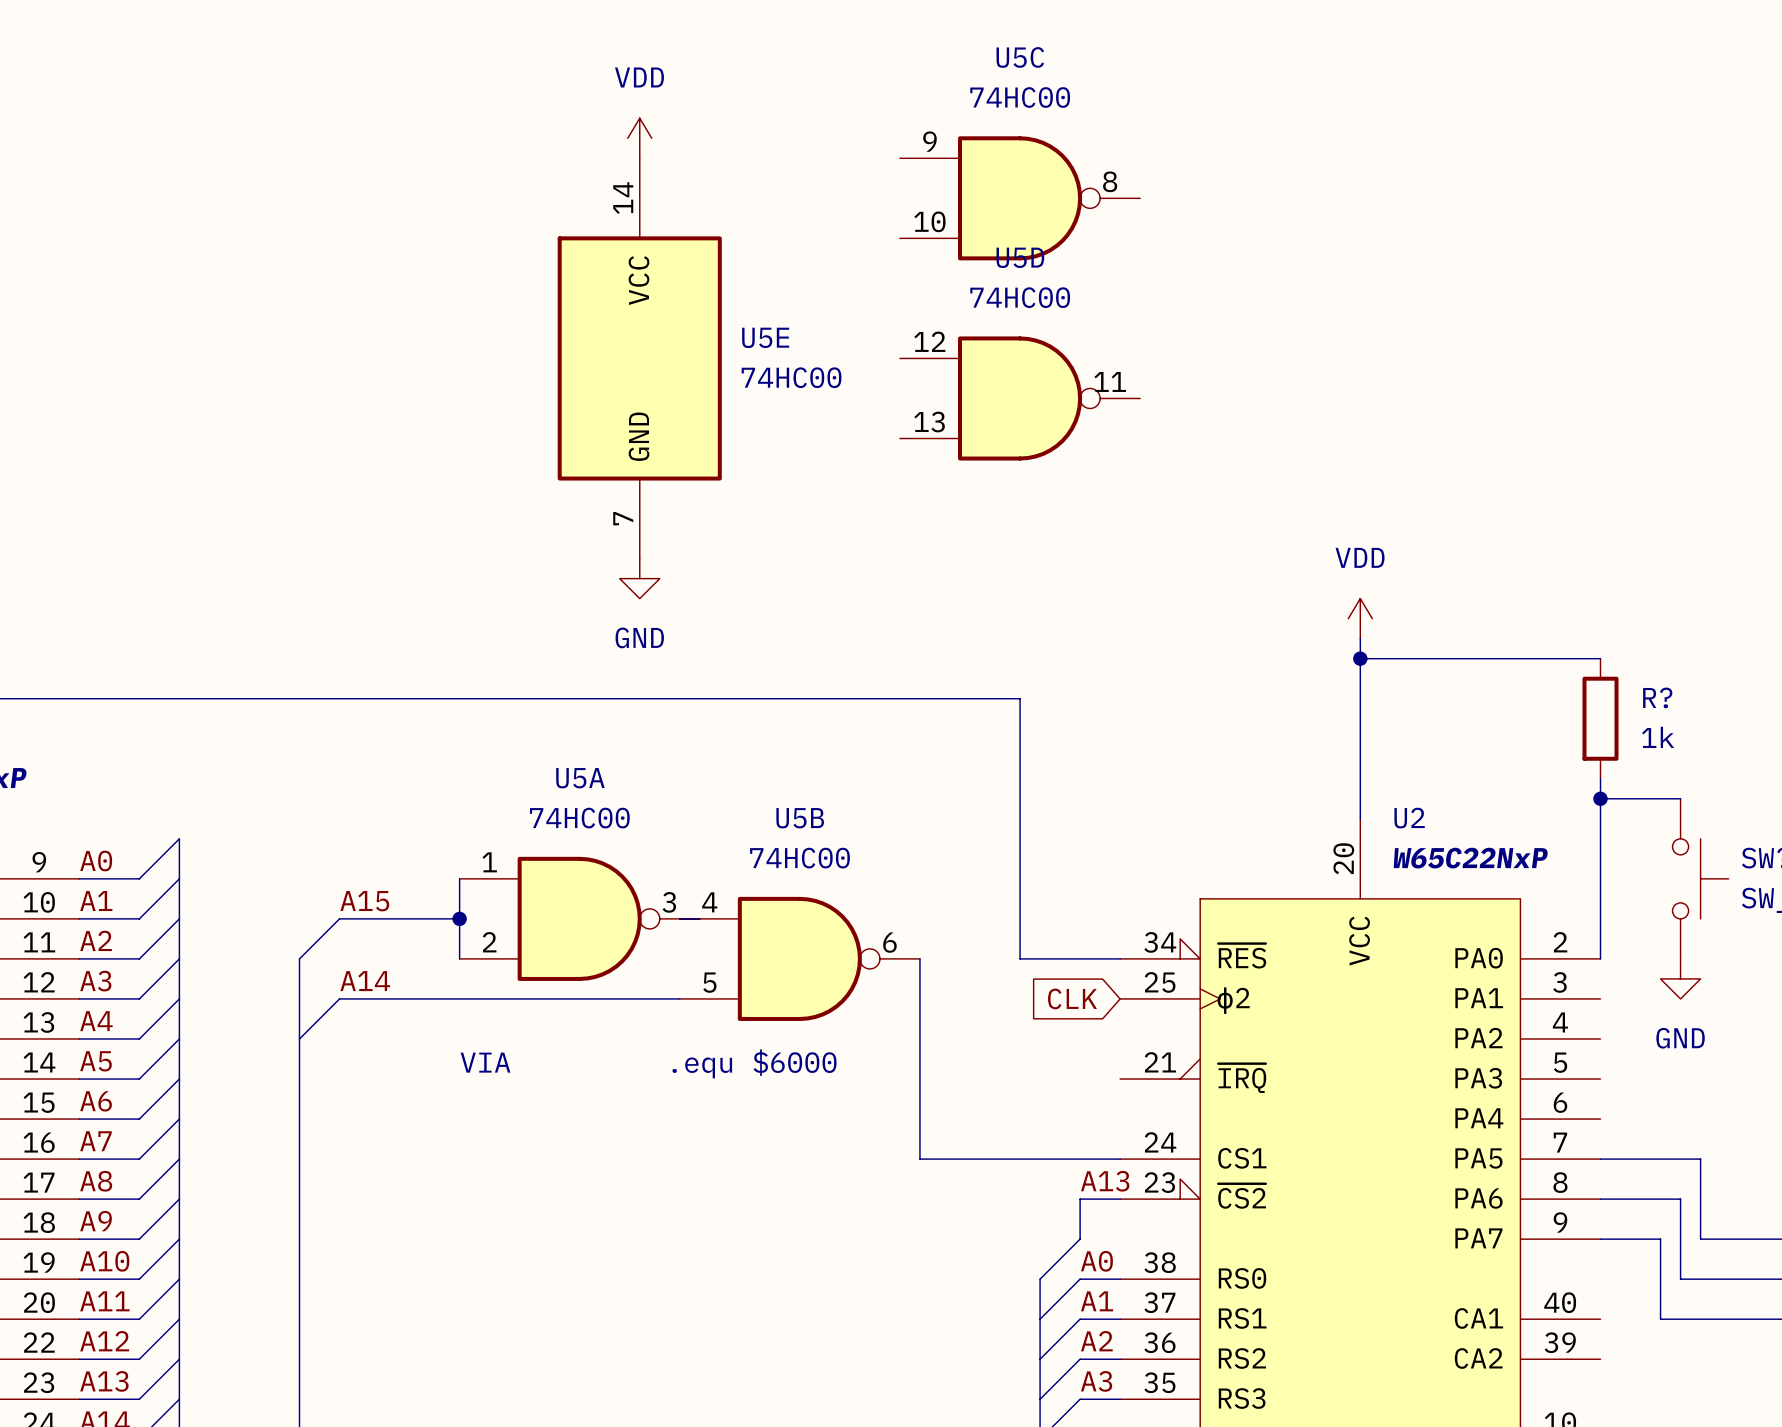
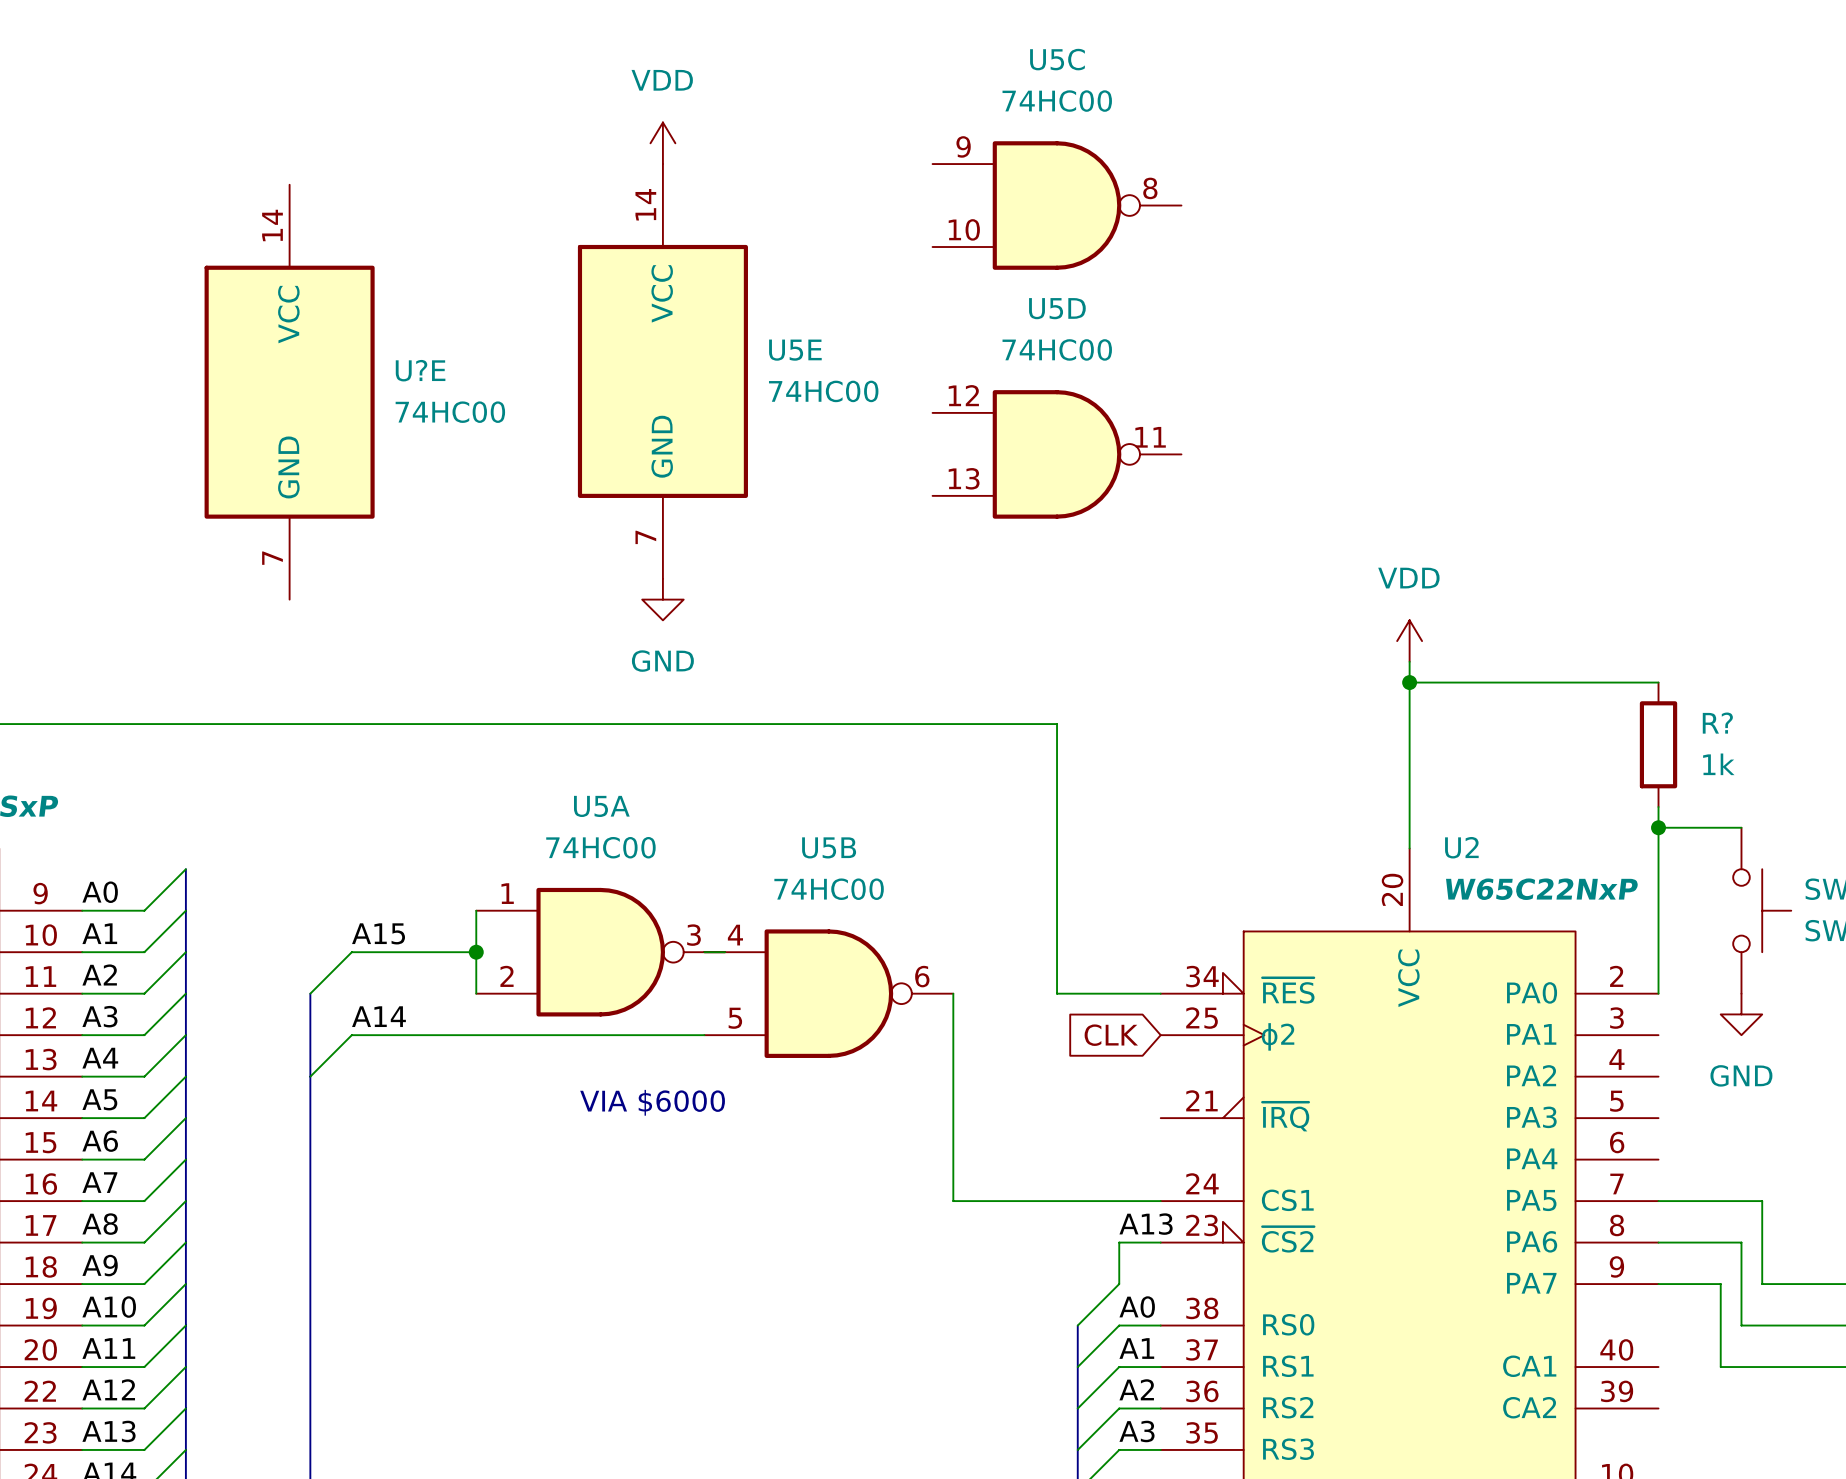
U?E: none -> 74HC00 (289, 392)
U5D position: (1020, 398) -> (1057, 454)
text: none -> VIA $6000 (652, 1102)
text: VIA .equ $6000 (648, 1063) -> none

